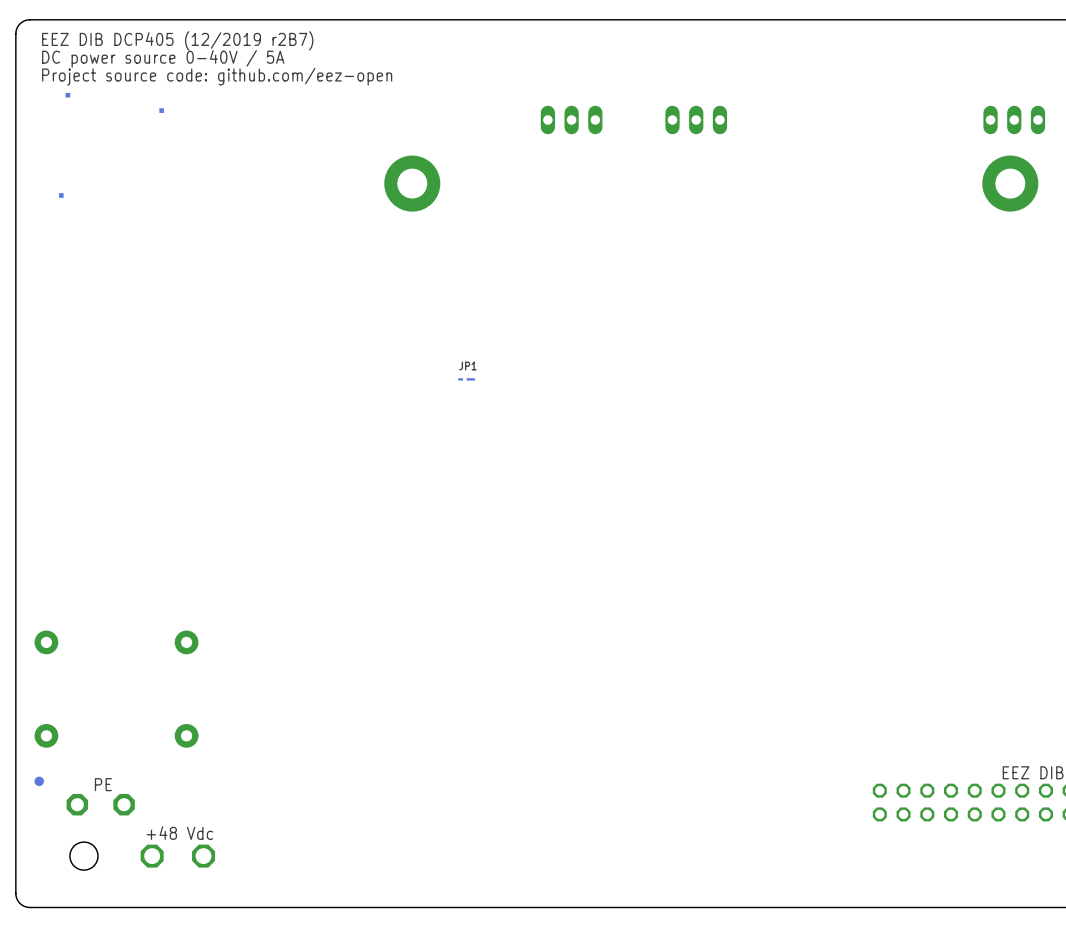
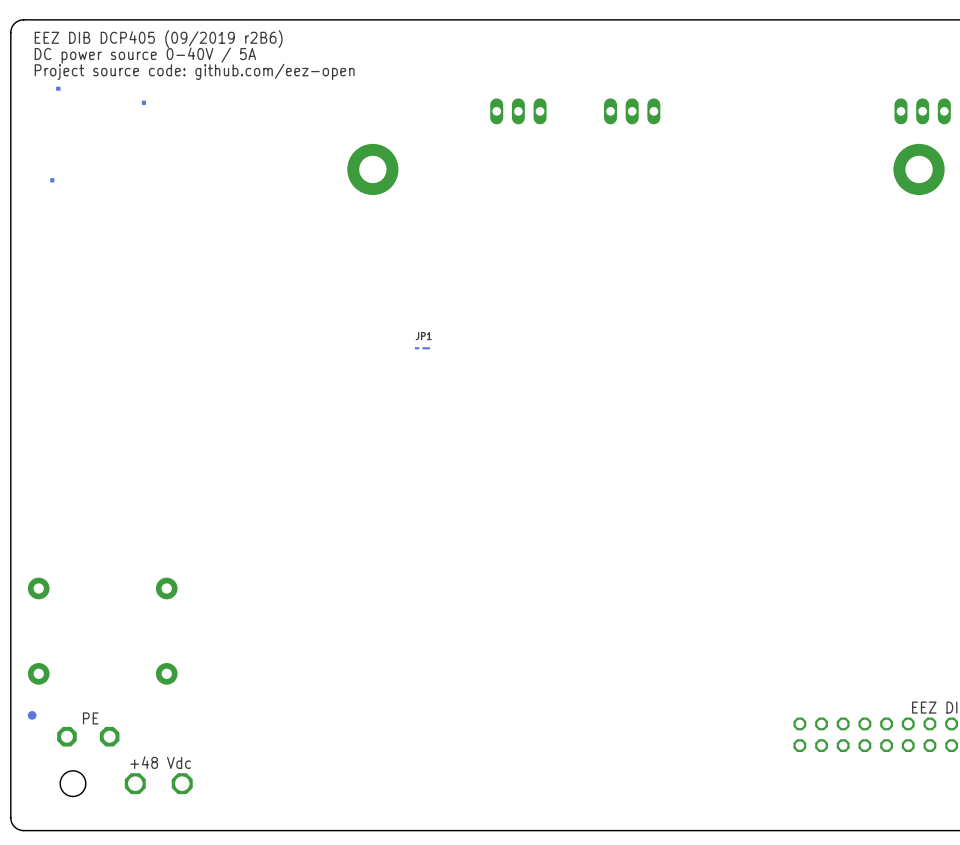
text: EEZ DIB DCP405 (12/2019 r2B7) (177, 40) -> EEZ DIB DCP405 (09/2019 r2B6) (158, 39)

